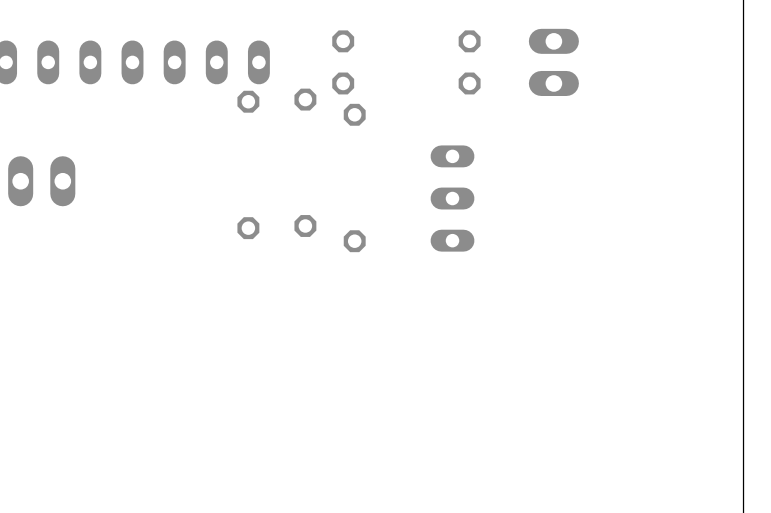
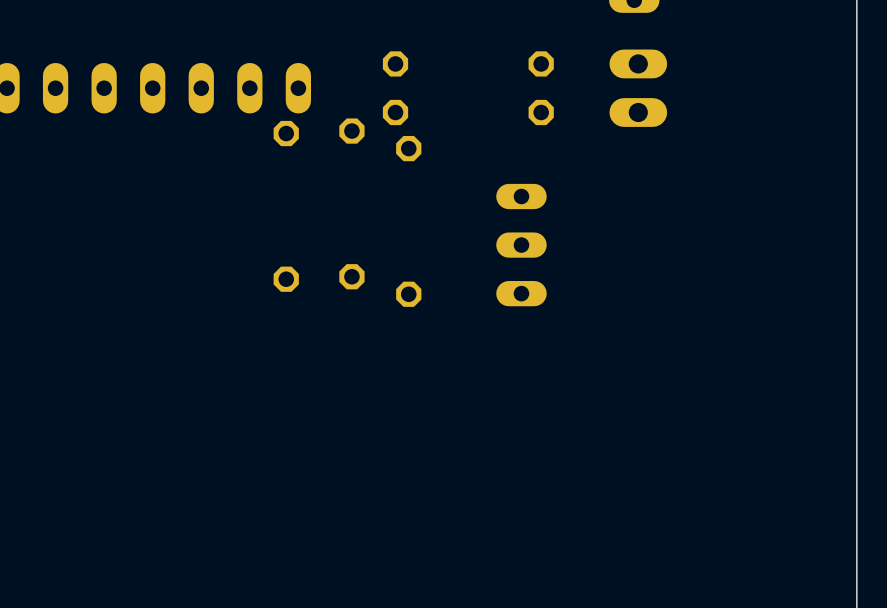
part: (41, 181) -> none

